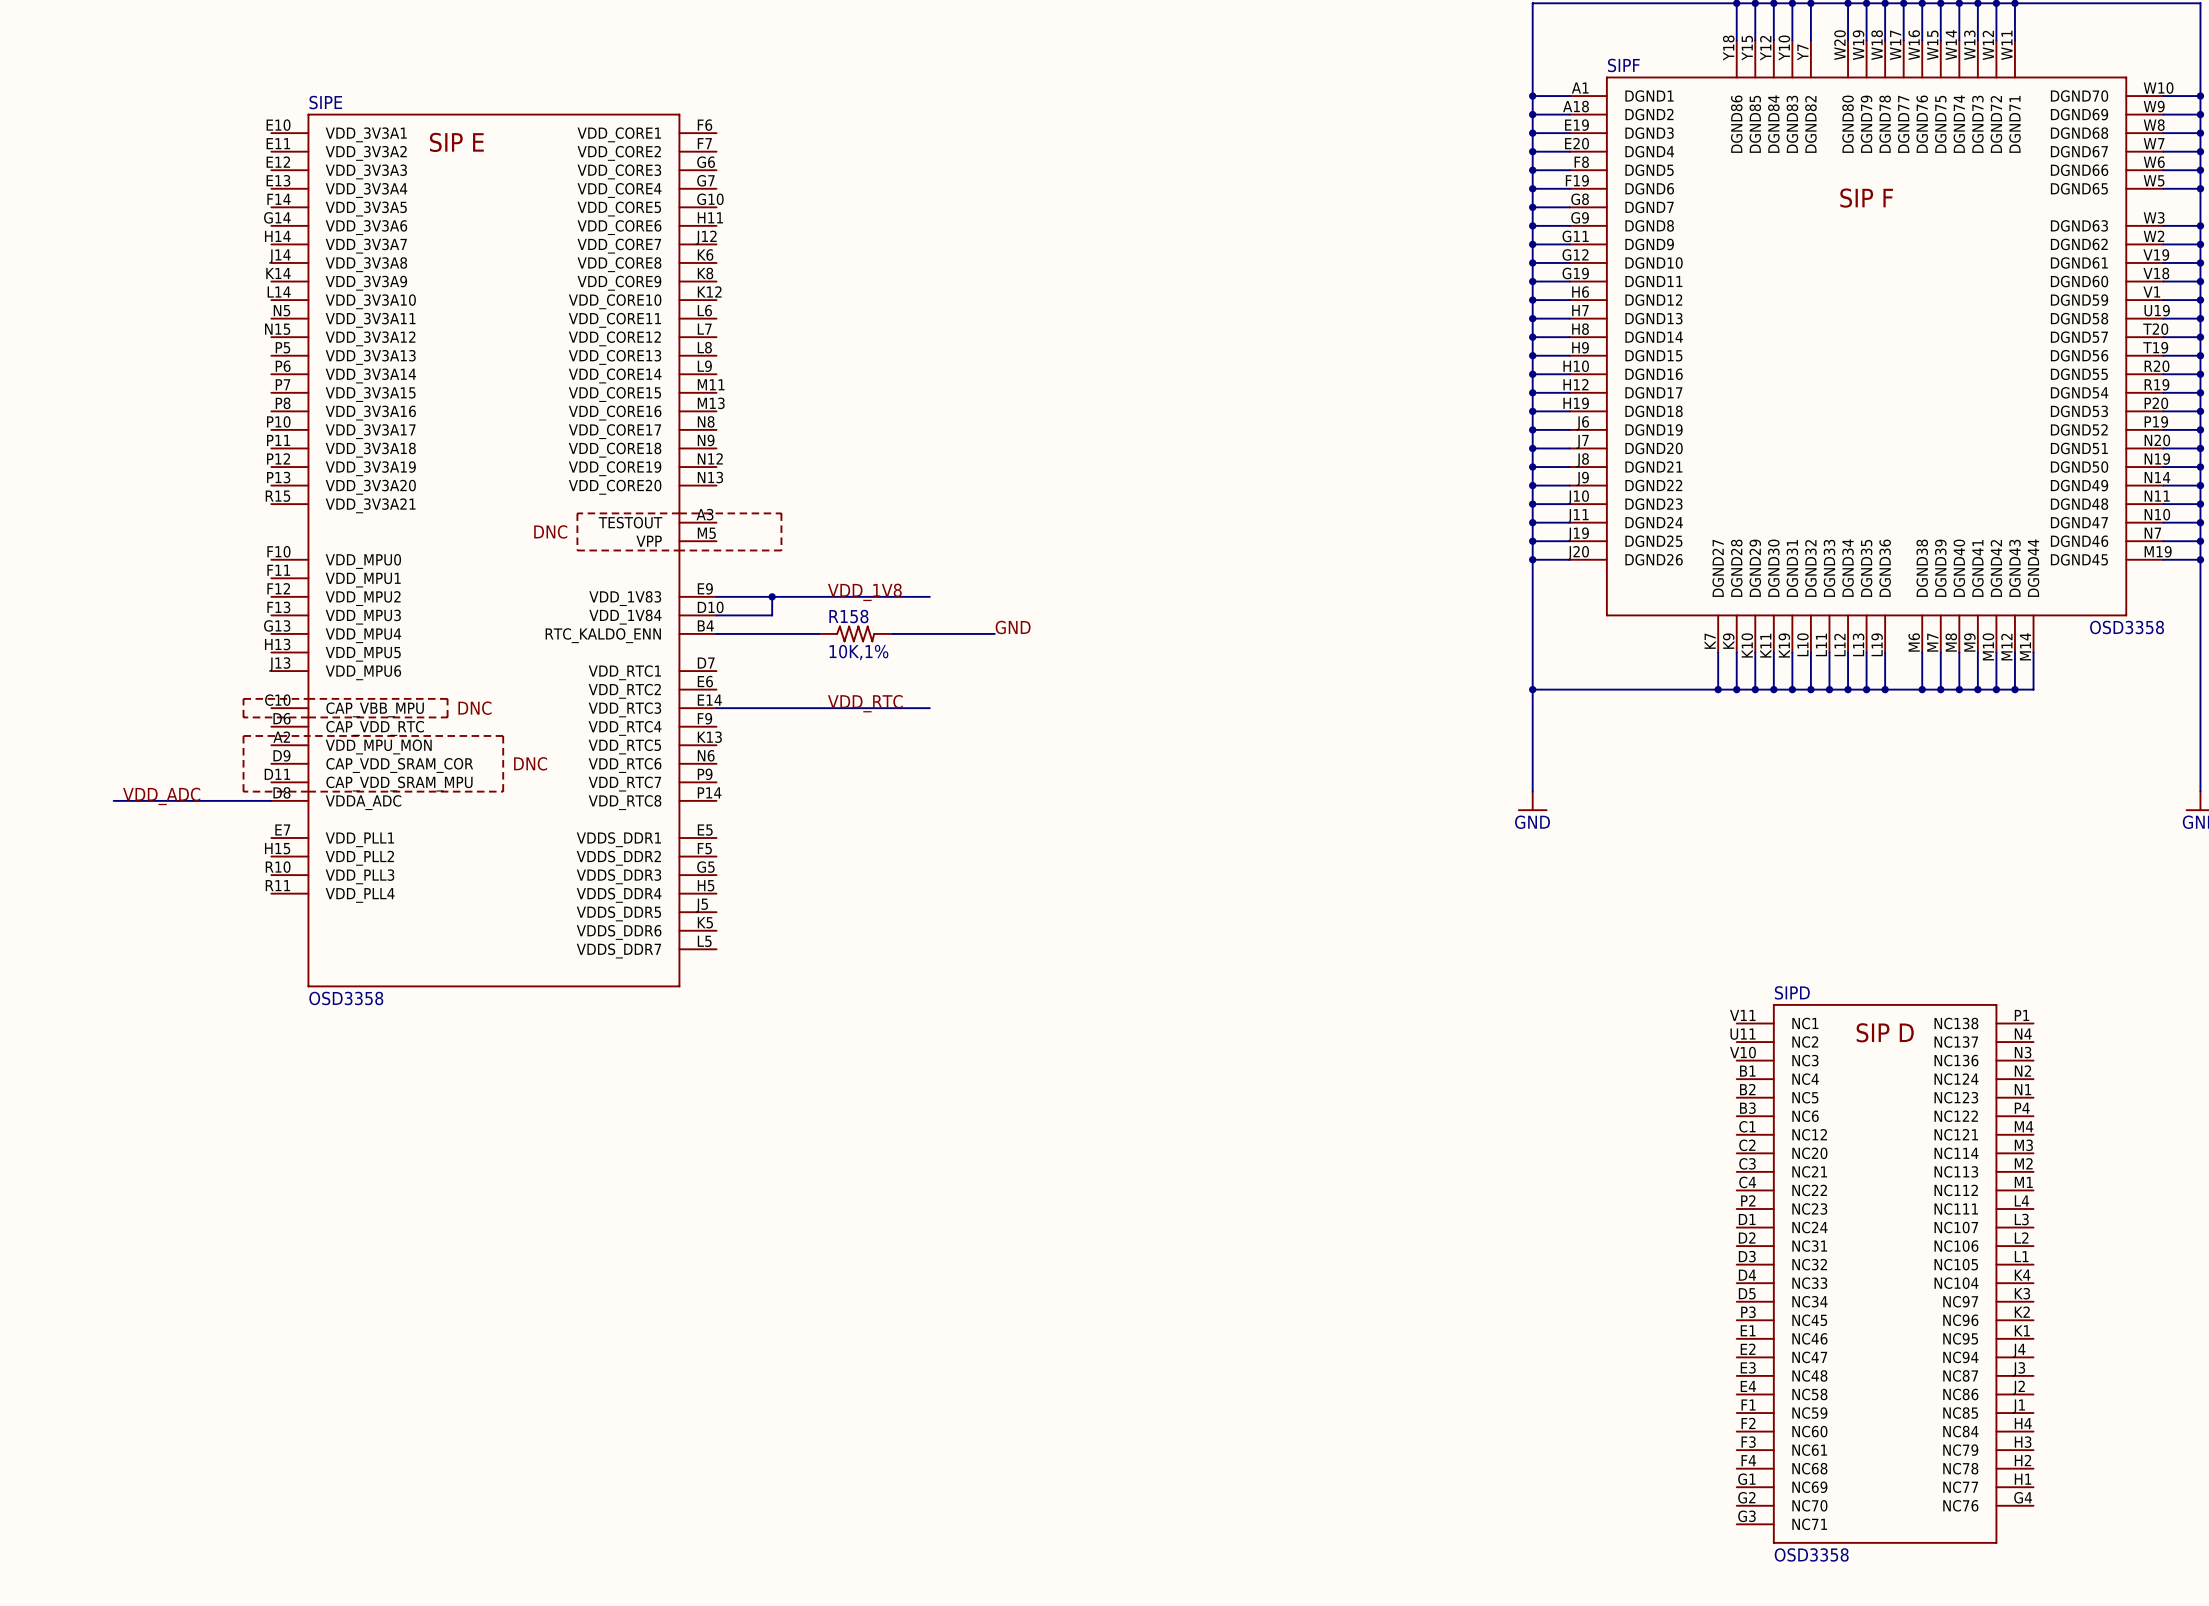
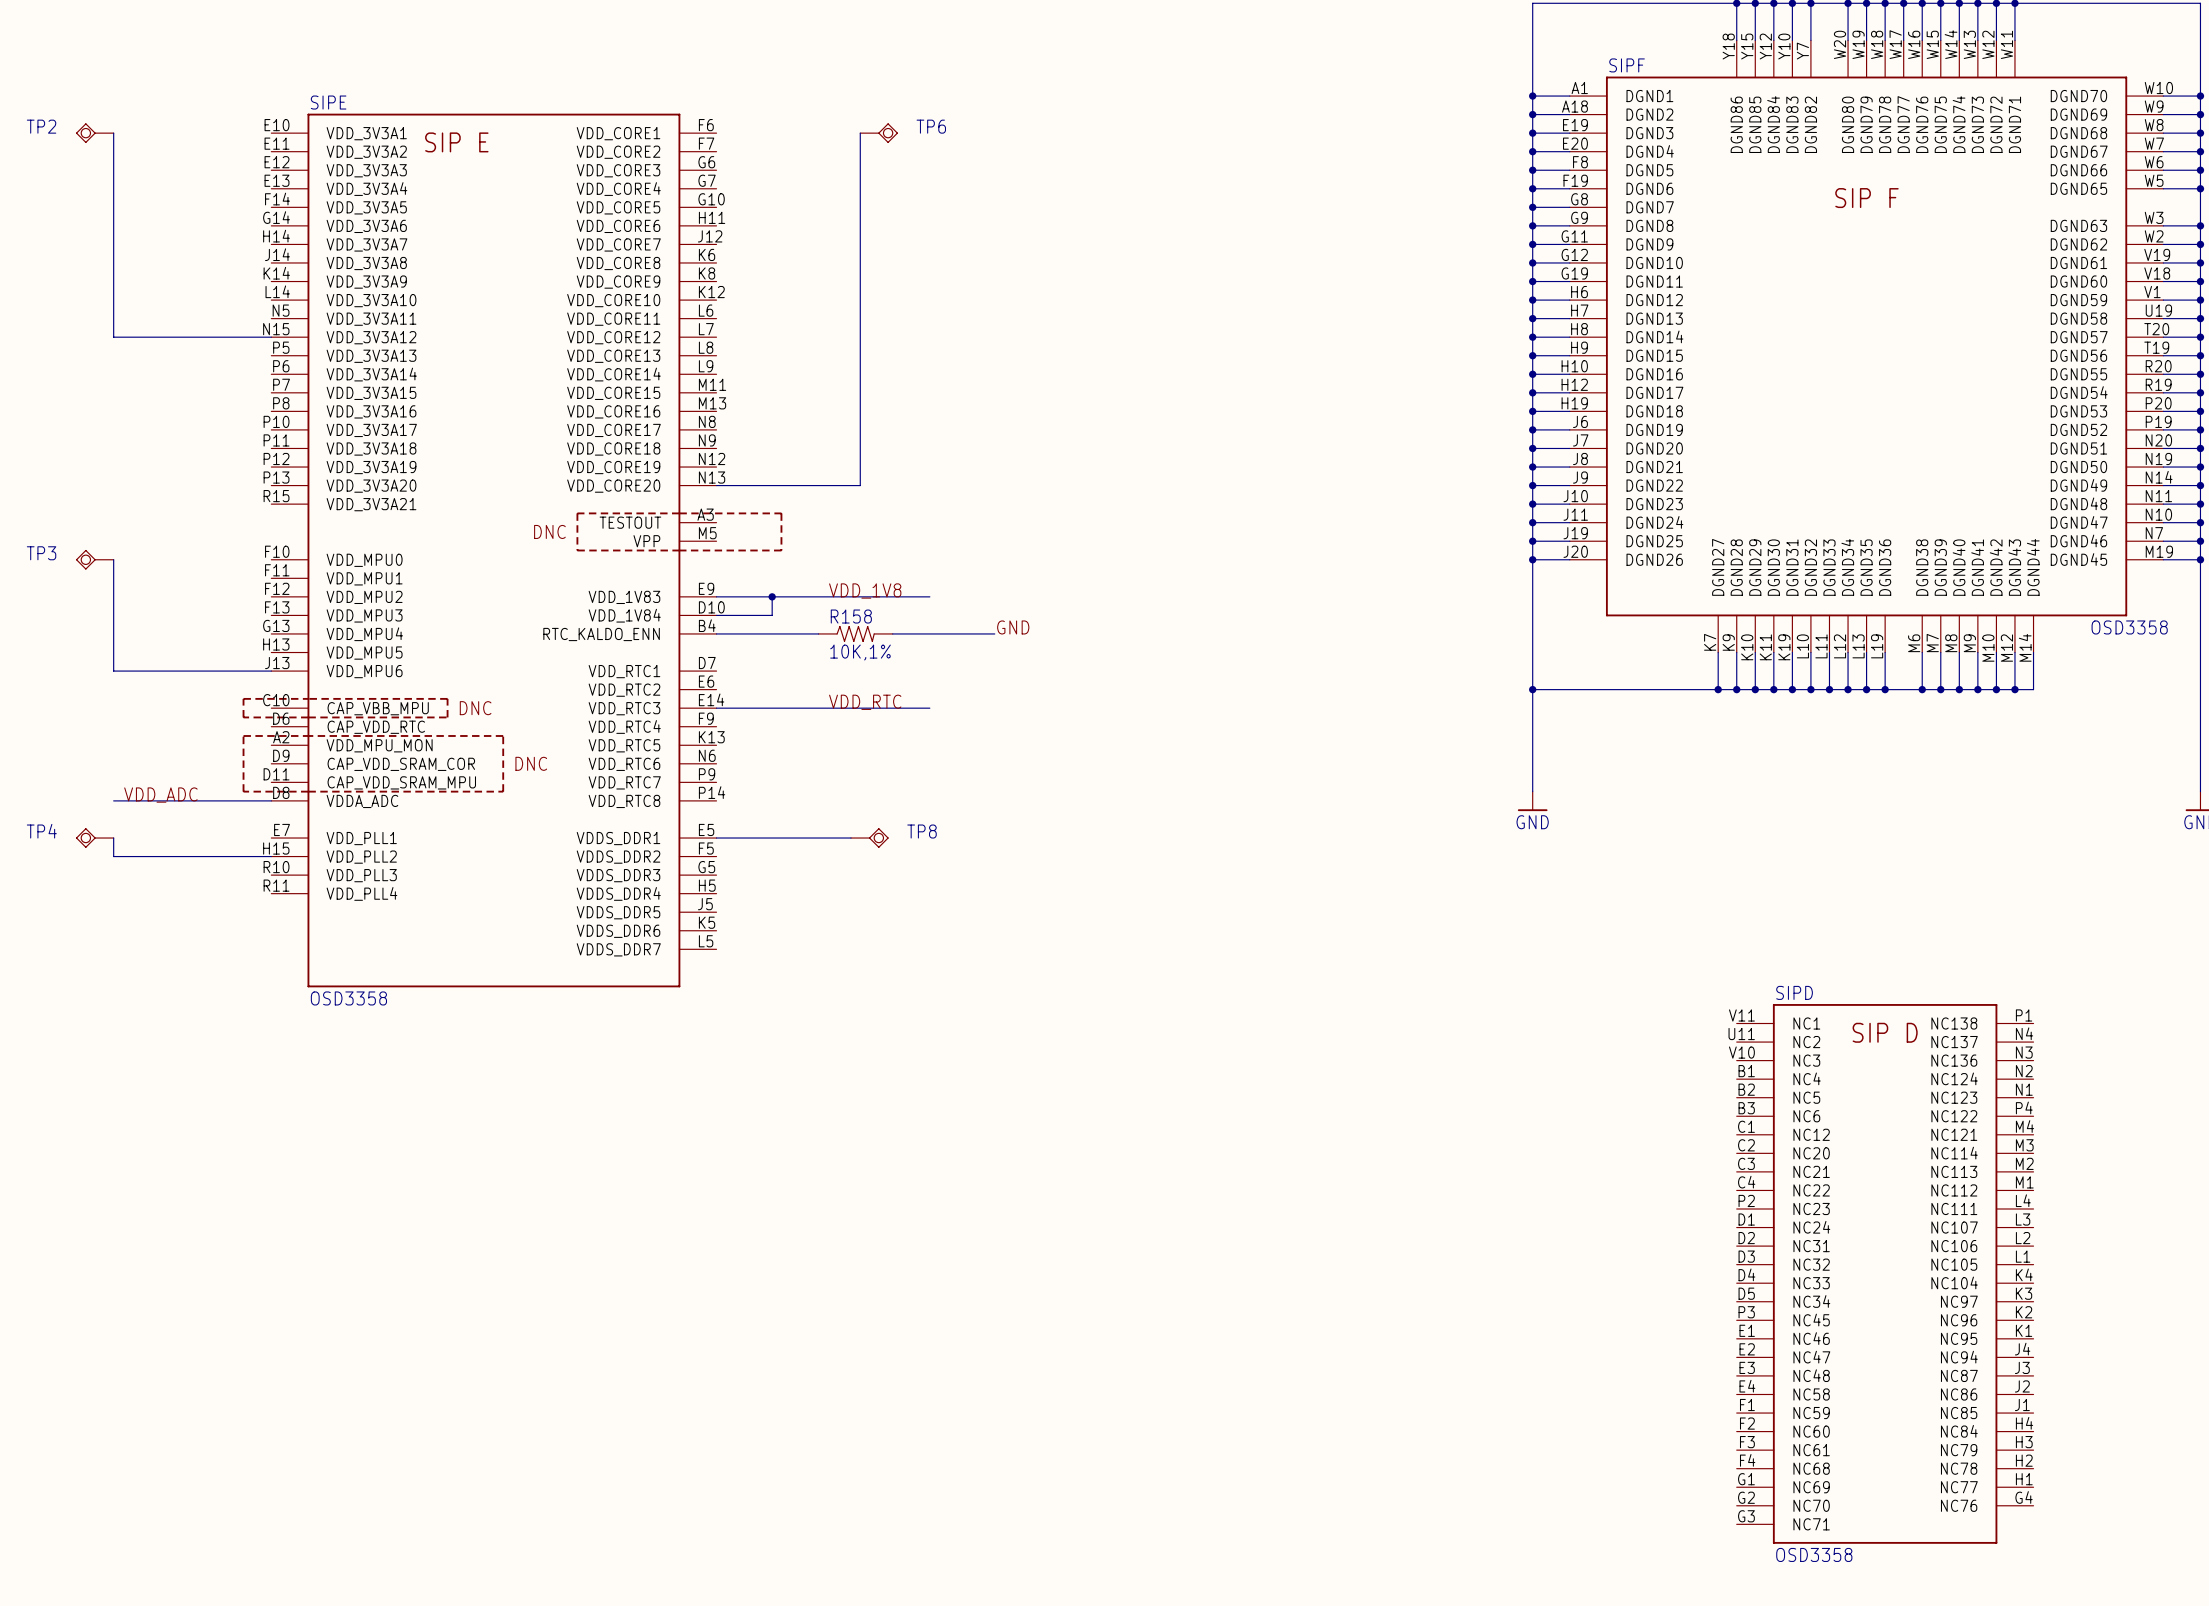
TP2: none -> (94, 133)
wire: none -> (113, 133) (113, 337) (271, 337)
wire: none -> (860, 133) (860, 485) (716, 485)
TP6: none -> (879, 133)
TP3: none -> (94, 559)
wire: none -> (113, 559) (113, 671) (271, 671)
TP4: none -> (94, 838)
wire: none -> (113, 838) (113, 856) (271, 856)
wire: none -> (716, 838) (851, 838)
TP8: none -> (869, 838)

